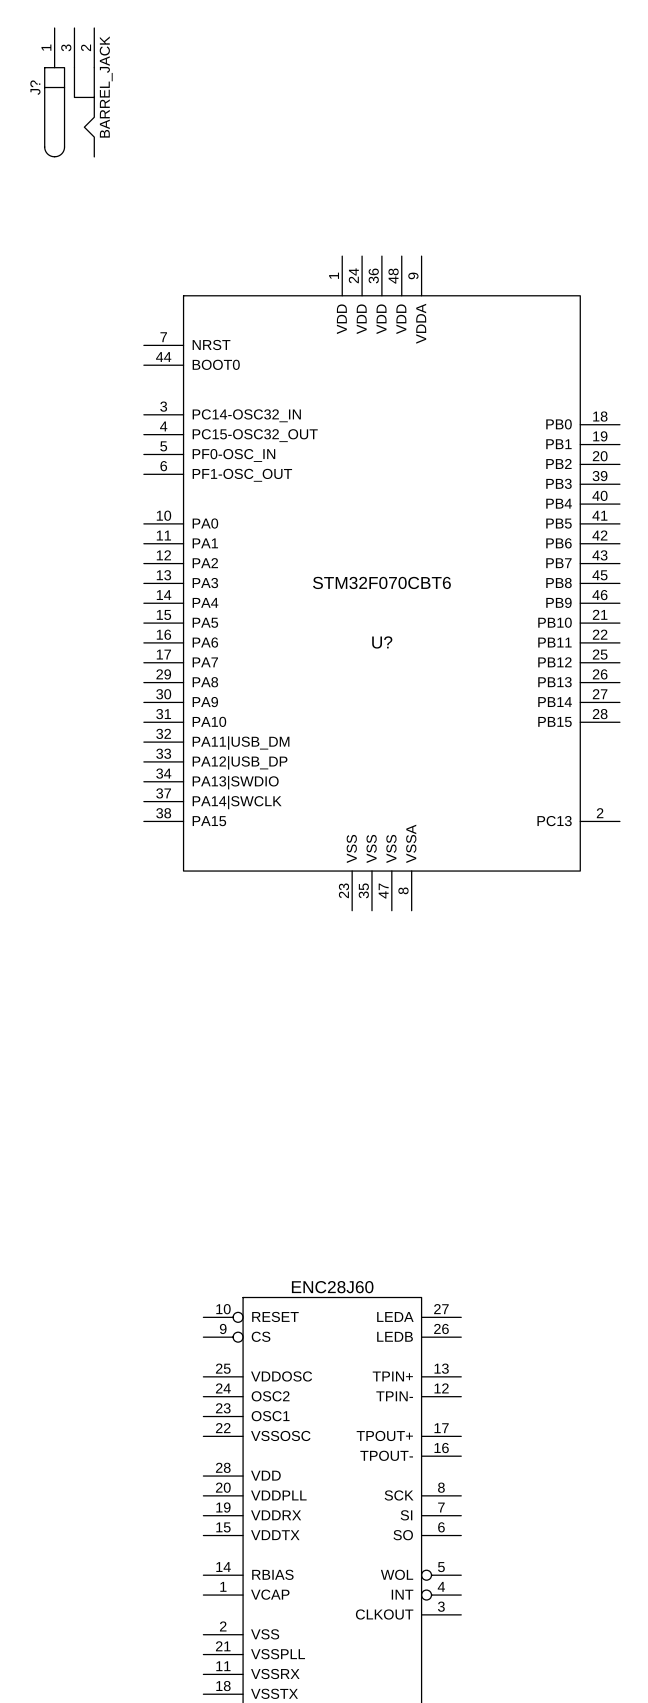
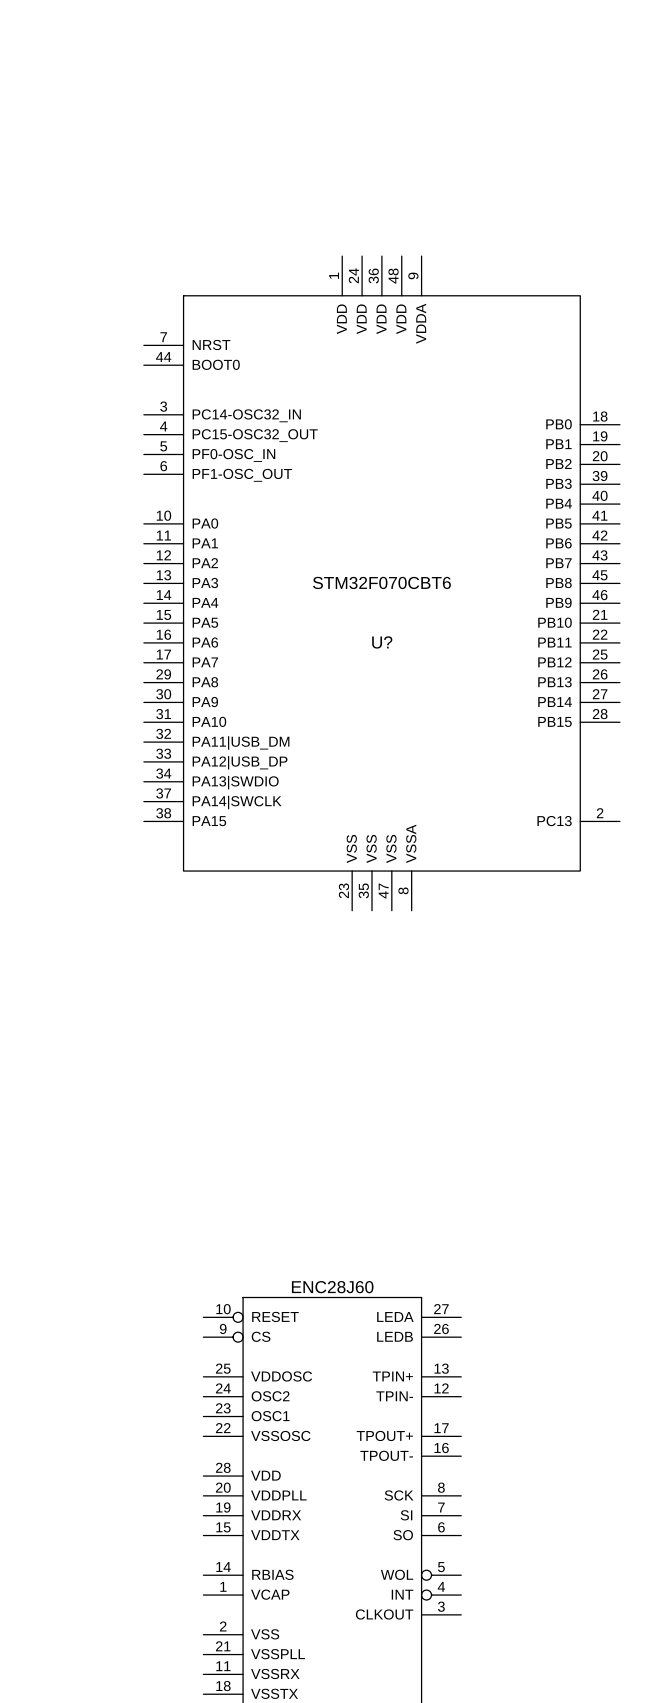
J?: BARREL_JACK (69, 92) -> none

